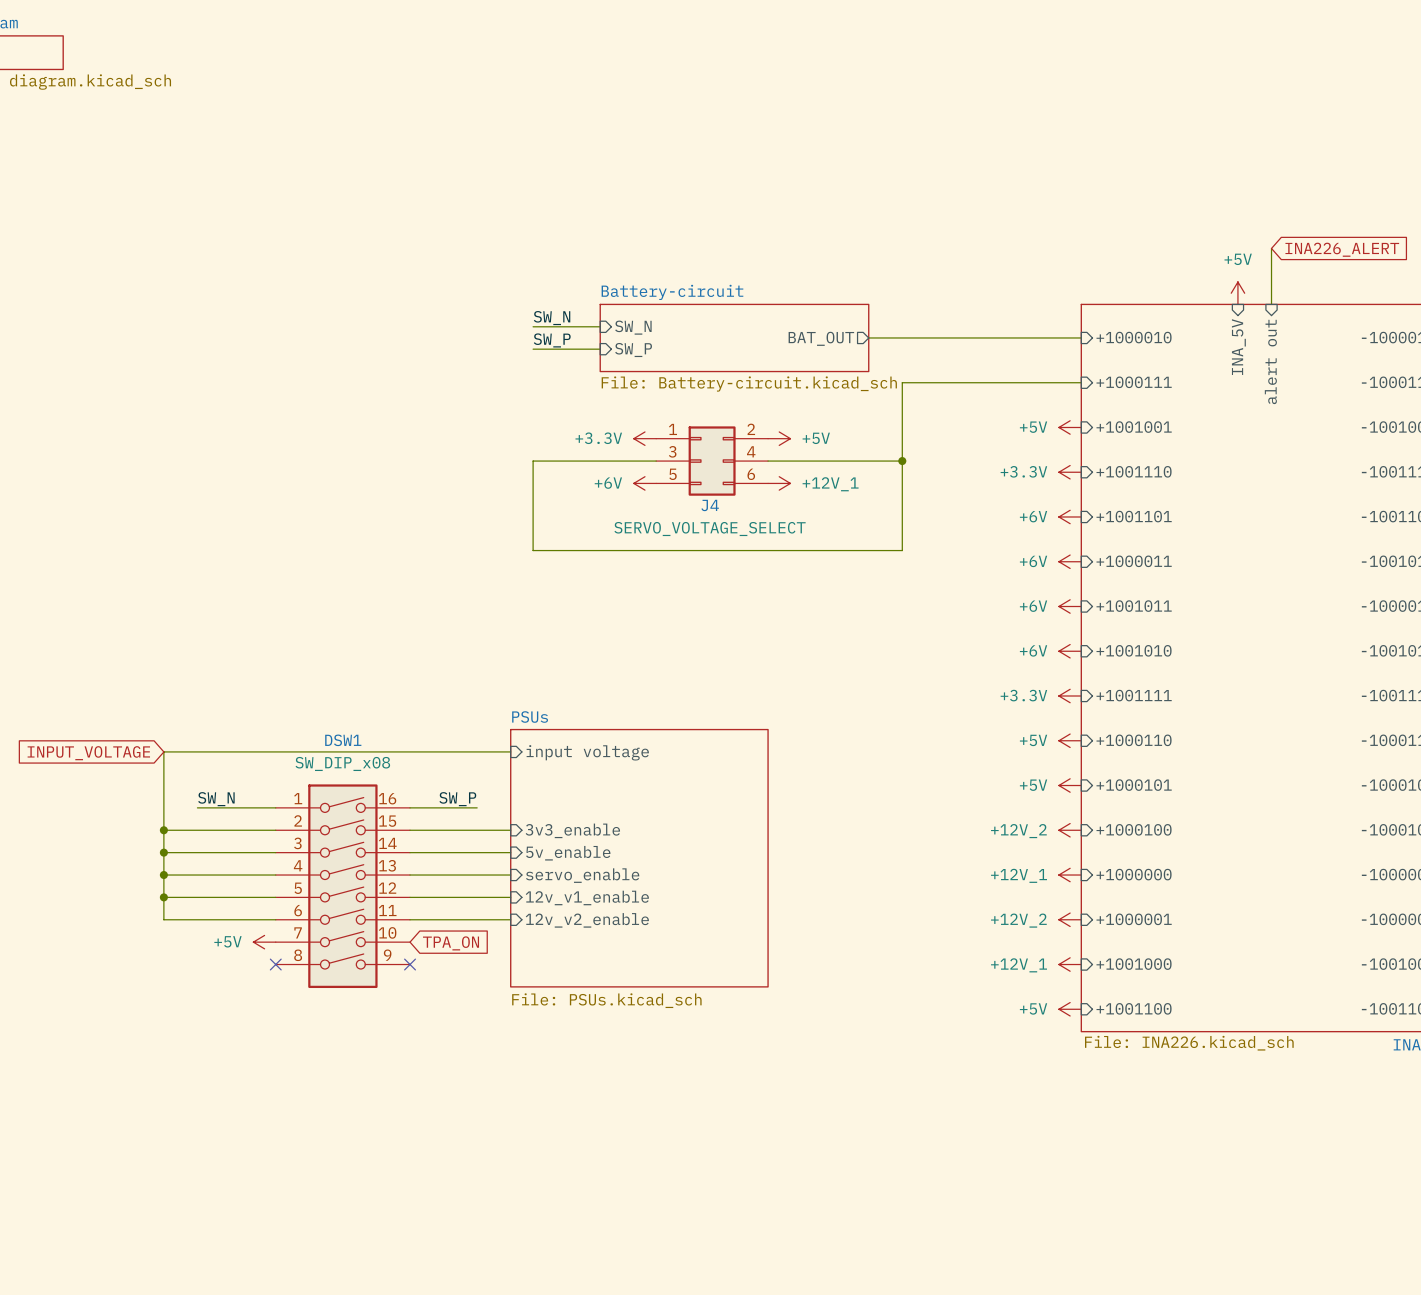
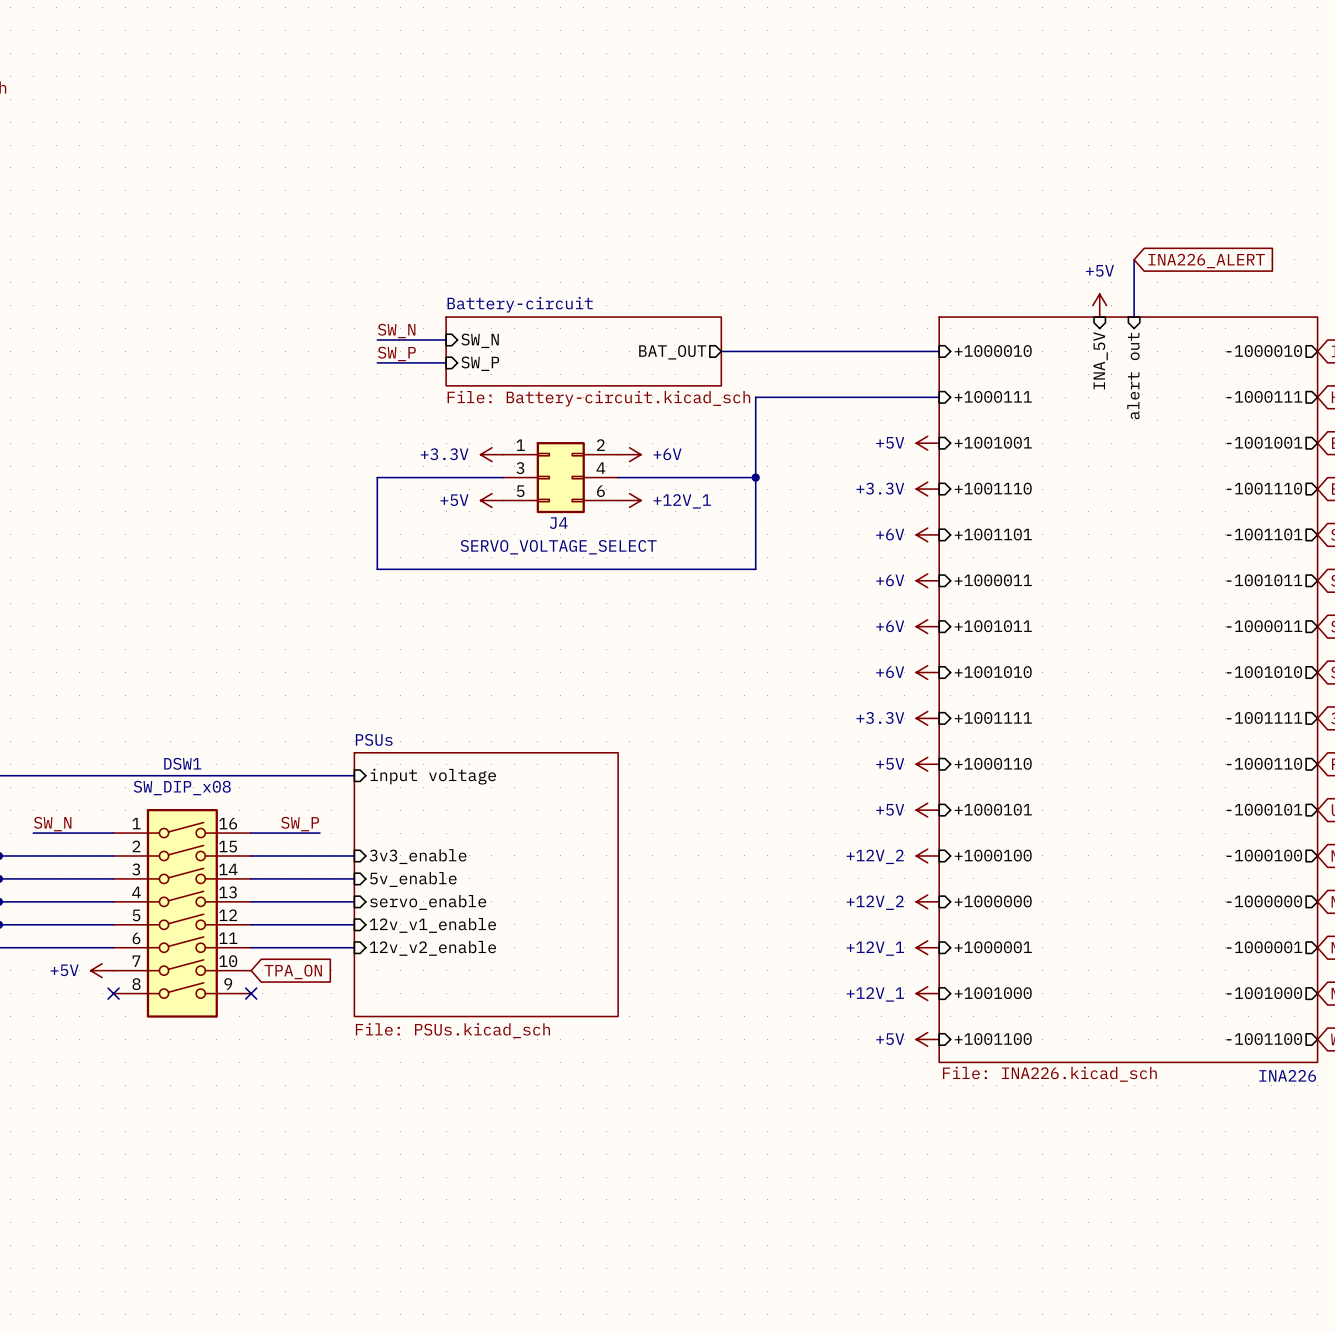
power symbol: +5V (779, 438) -> +6V (629, 454)
power symbol: +6V (644, 483) -> +5V (491, 500)
power symbol: +12V_1 (1070, 875) -> +12V_2 (927, 901)
power symbol: +12V_2 (1070, 919) -> +12V_1 (927, 947)

